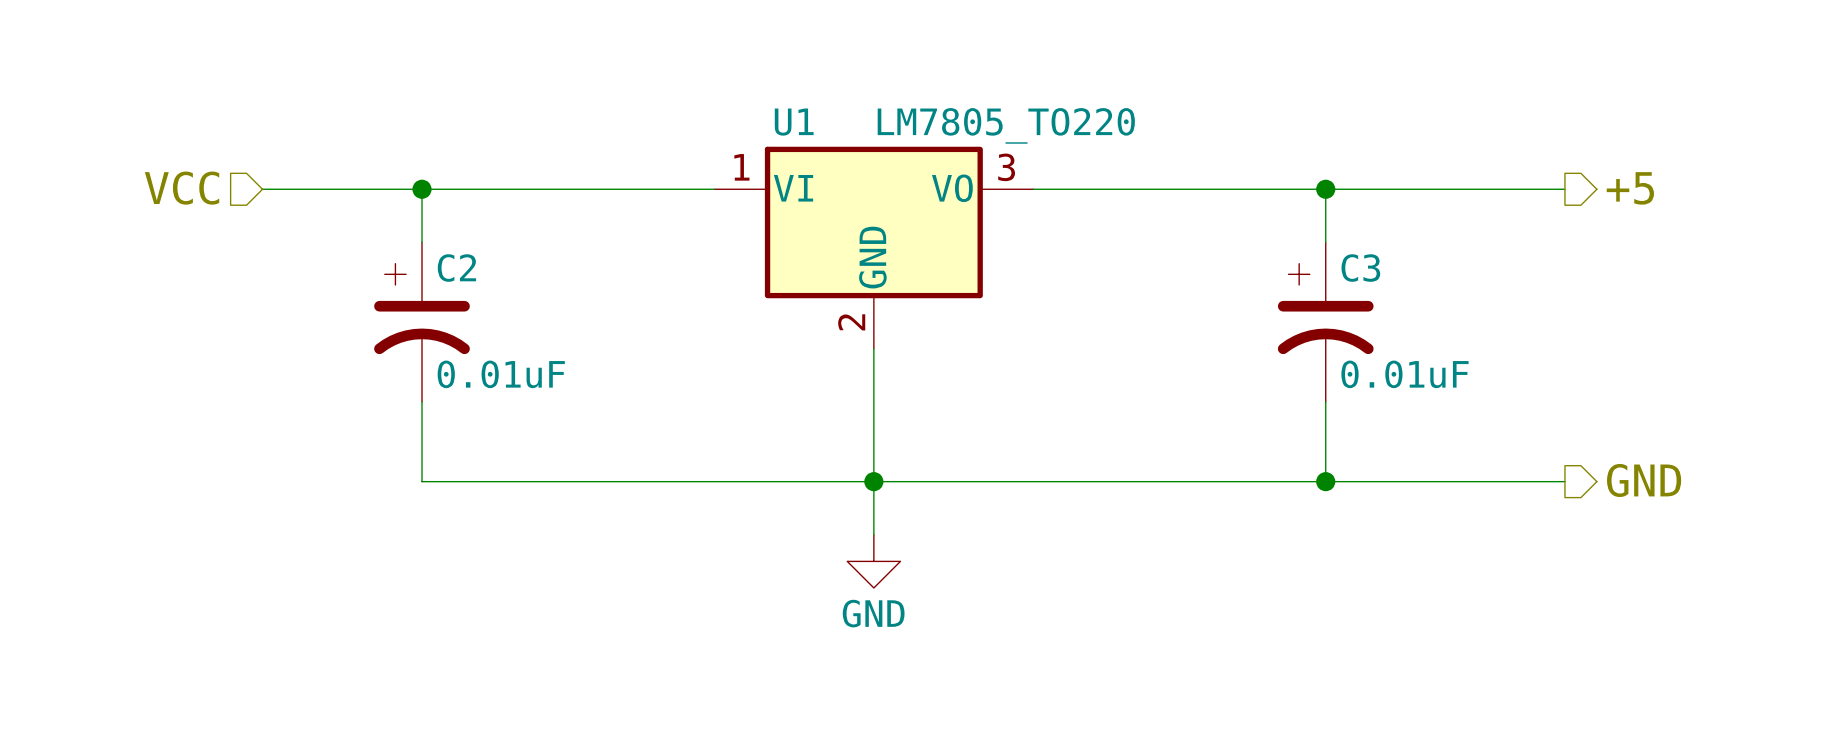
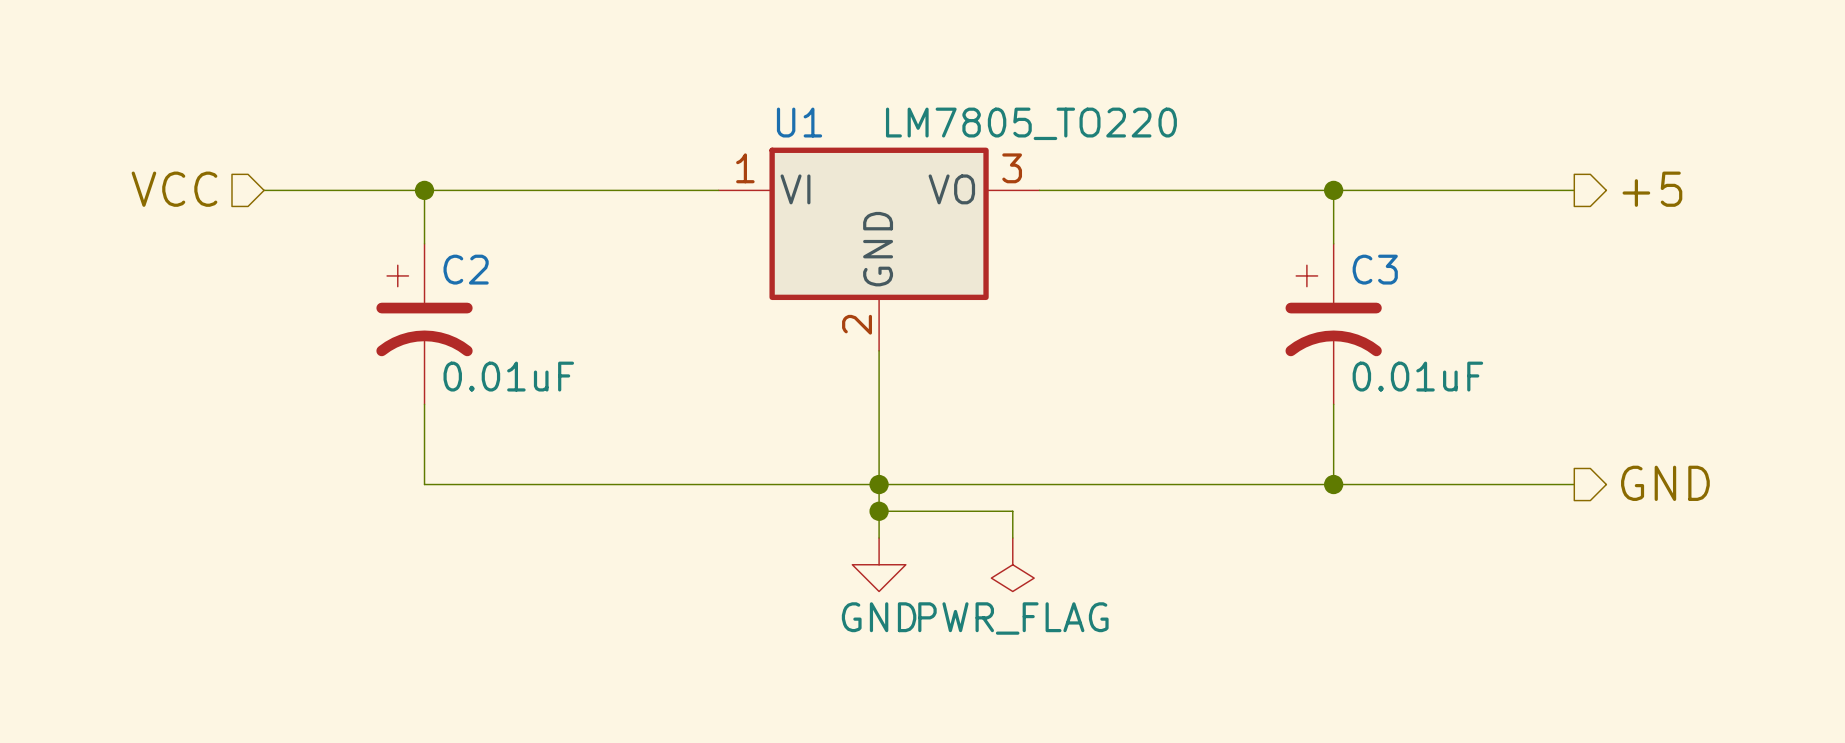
wire: none -> (879, 511) (1012, 511) (1012, 538)
junction: none -> (879, 511)
power symbol: none -> PWR_FLAG (1012, 564)

